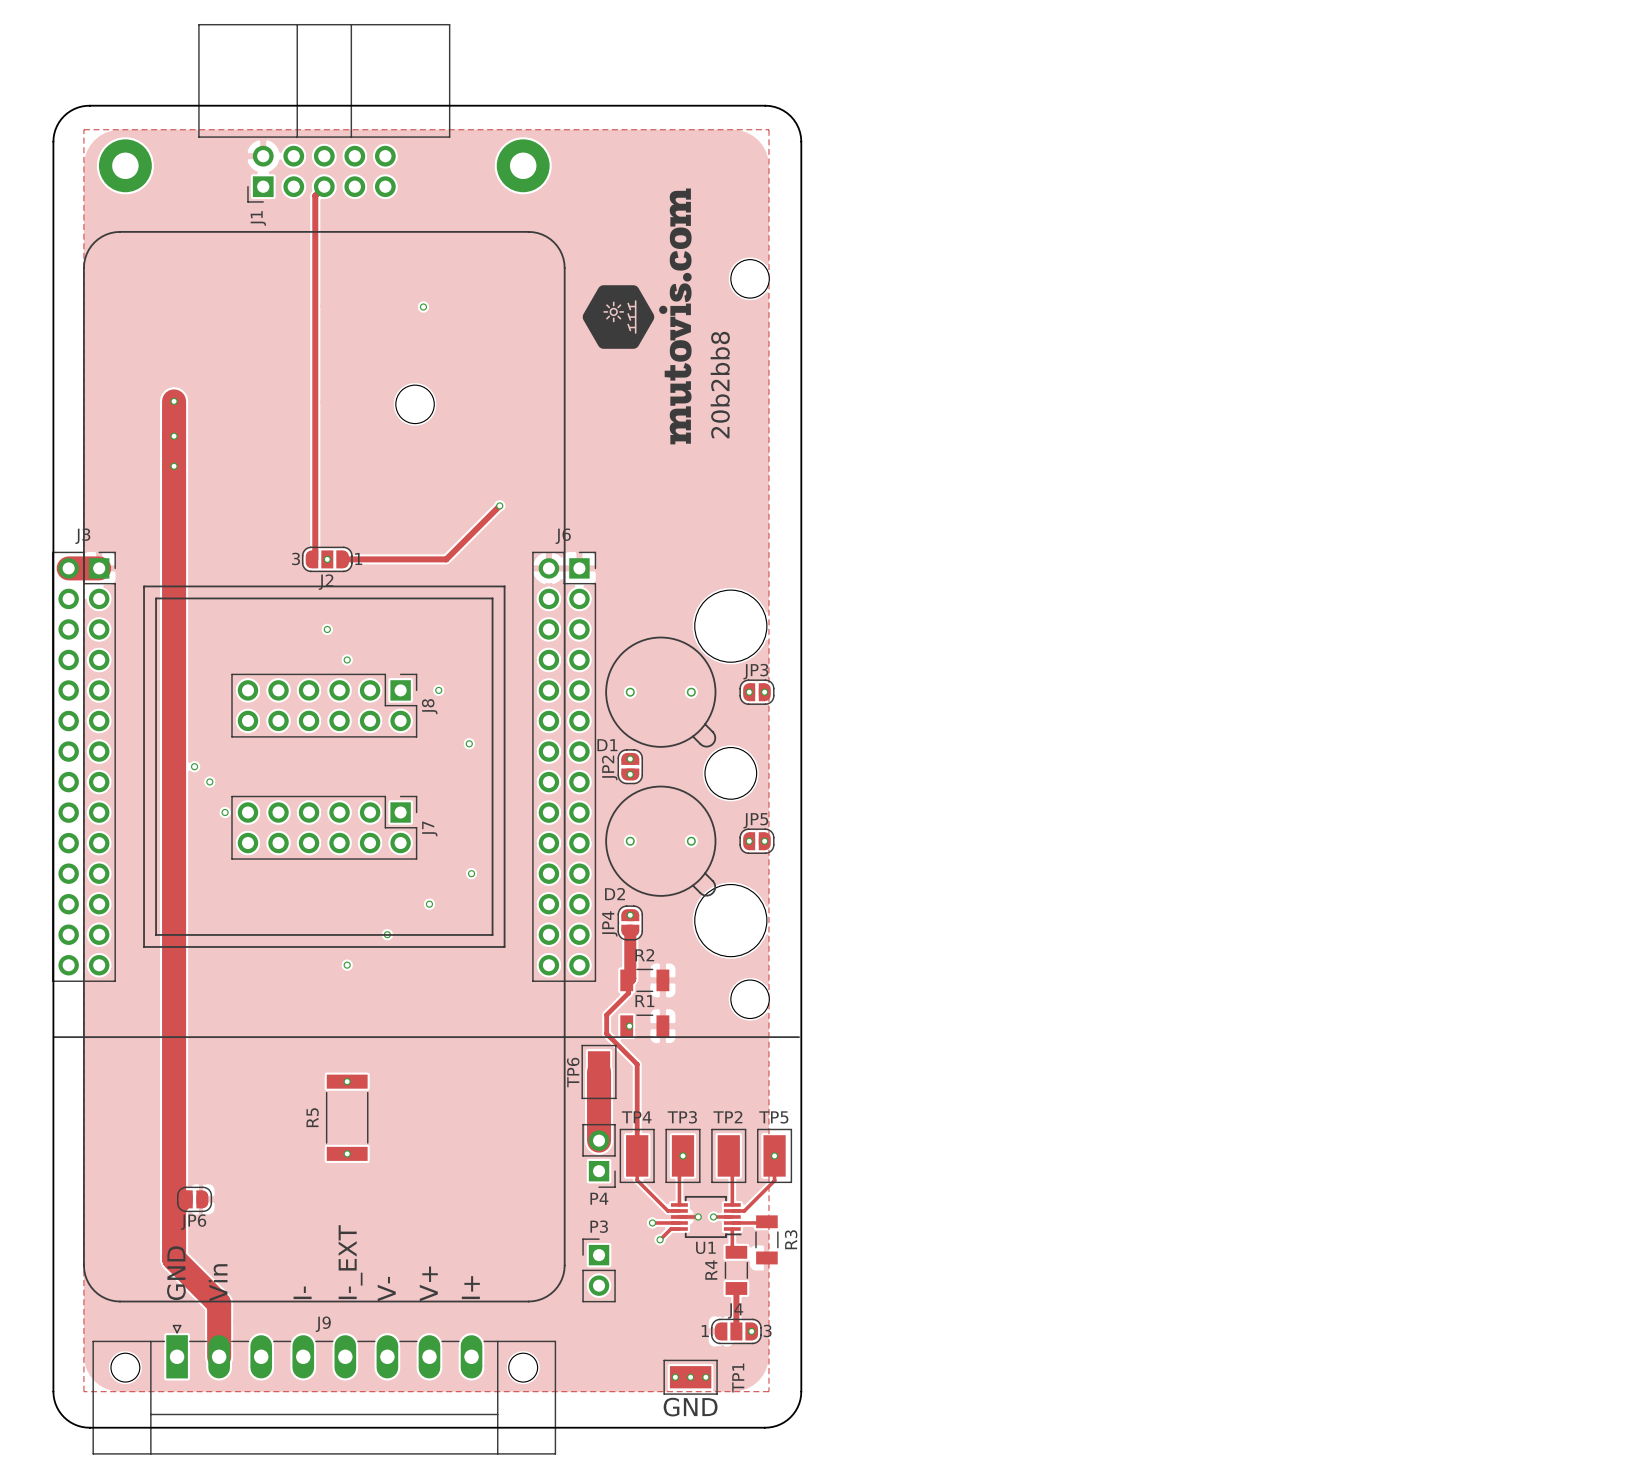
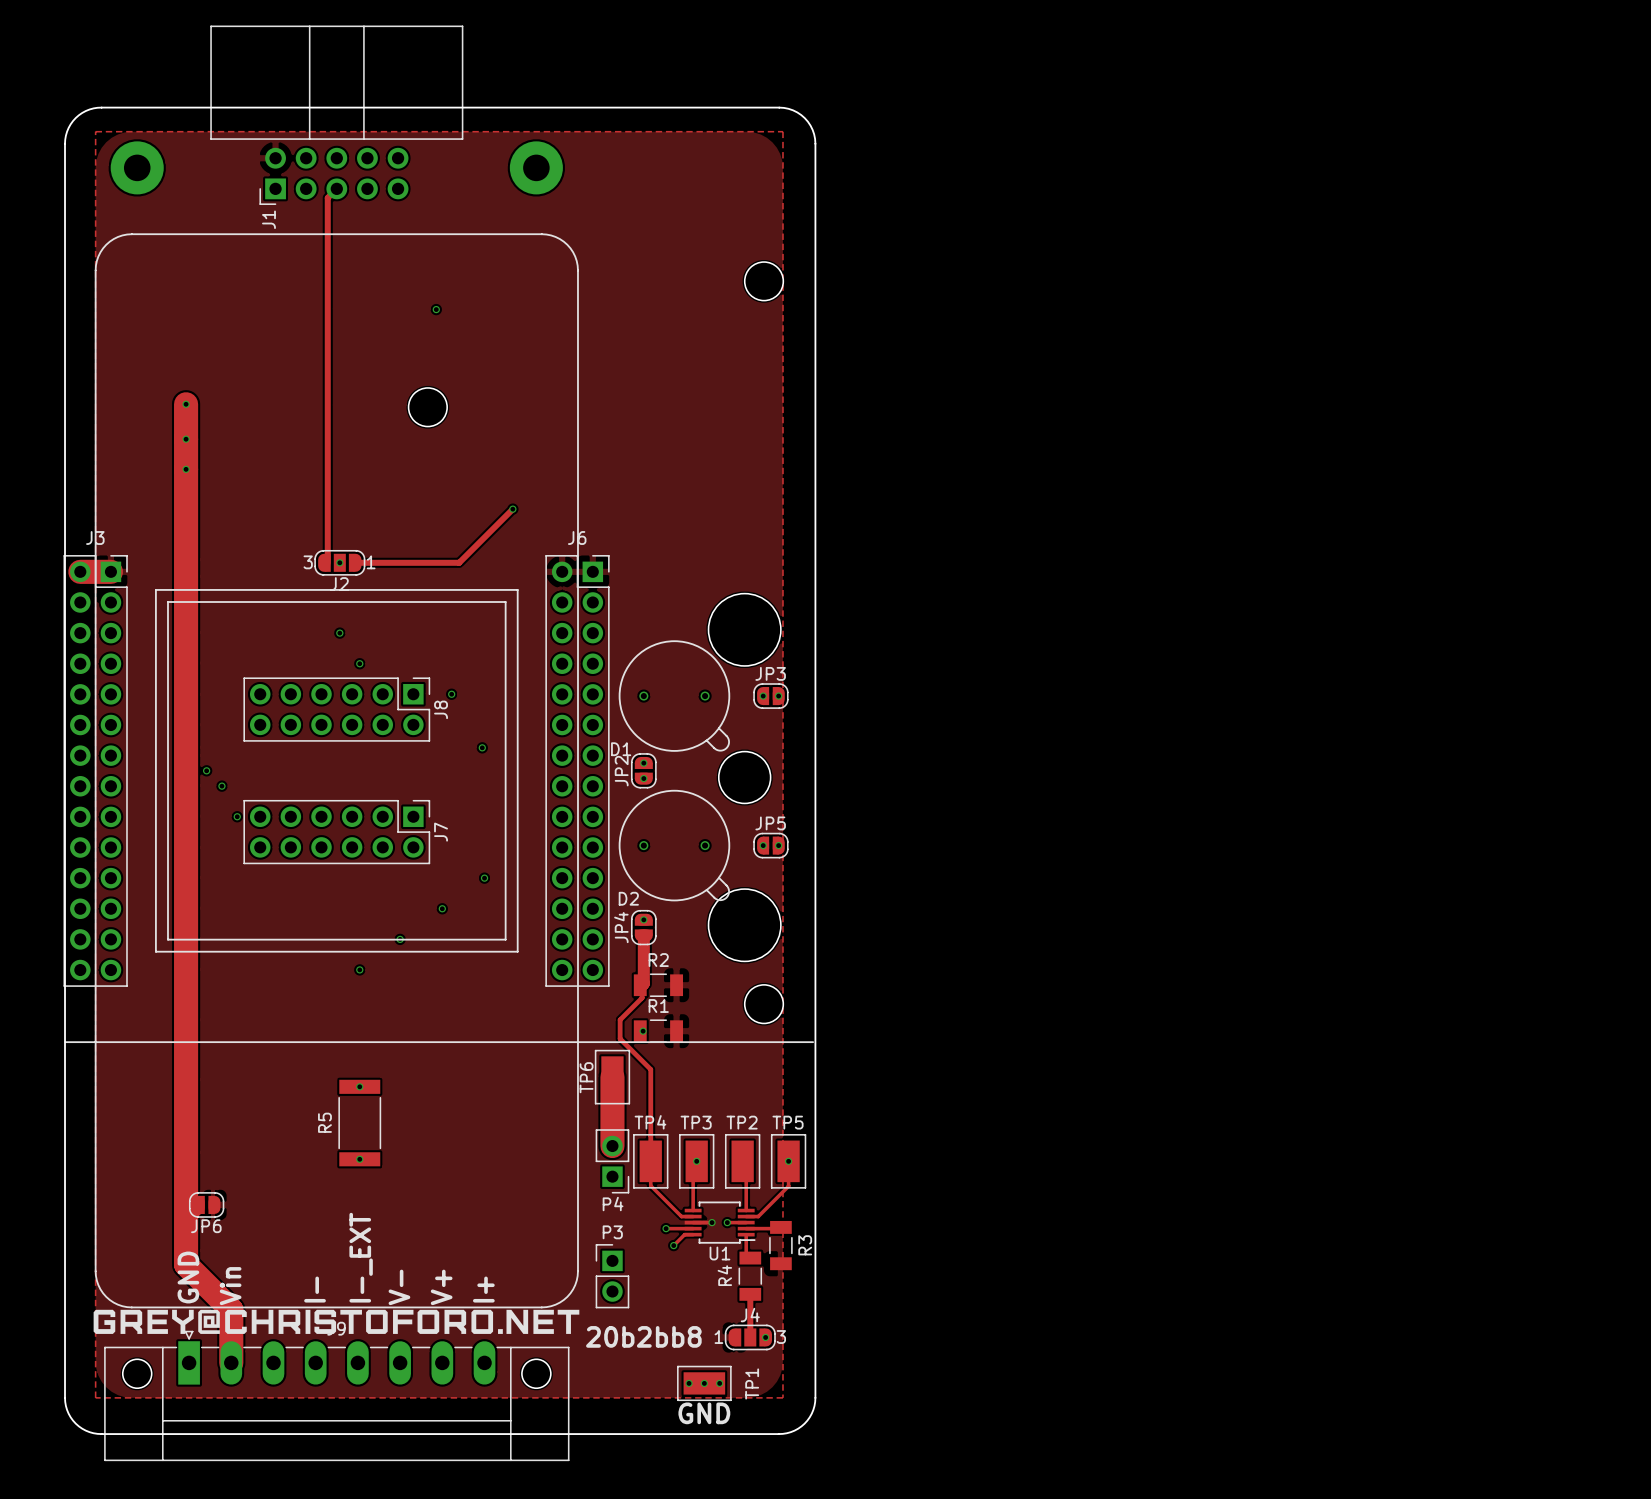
drawing: [582, 188, 692, 445] -> none
text: 20b2bb8 (720, 385) -> none
drawing: none -> [93, 1309, 580, 1334]
text: none -> 20b2bb8 (643, 1336)

